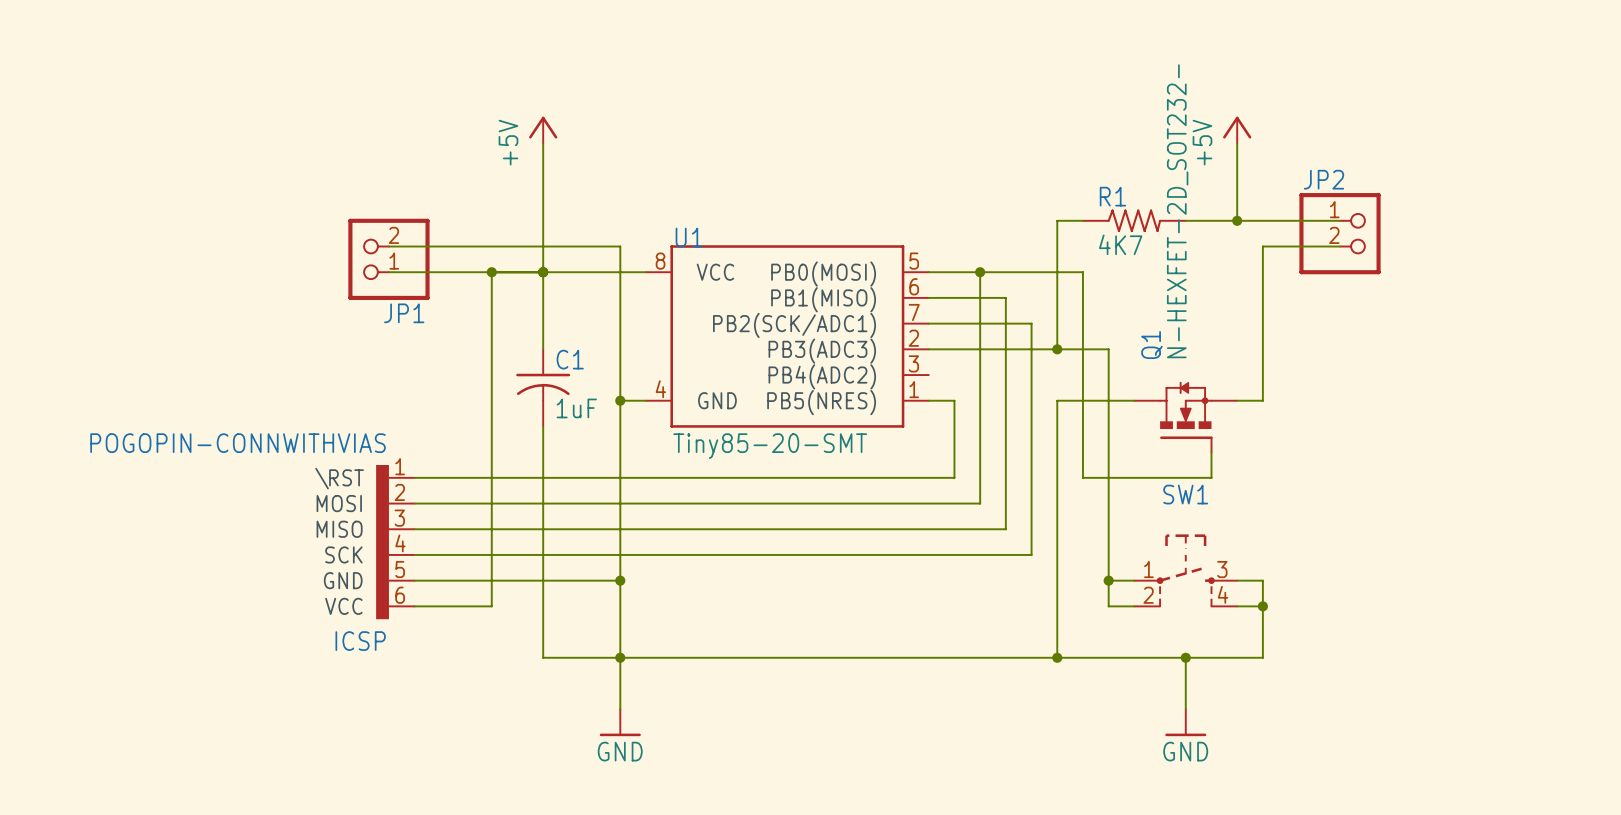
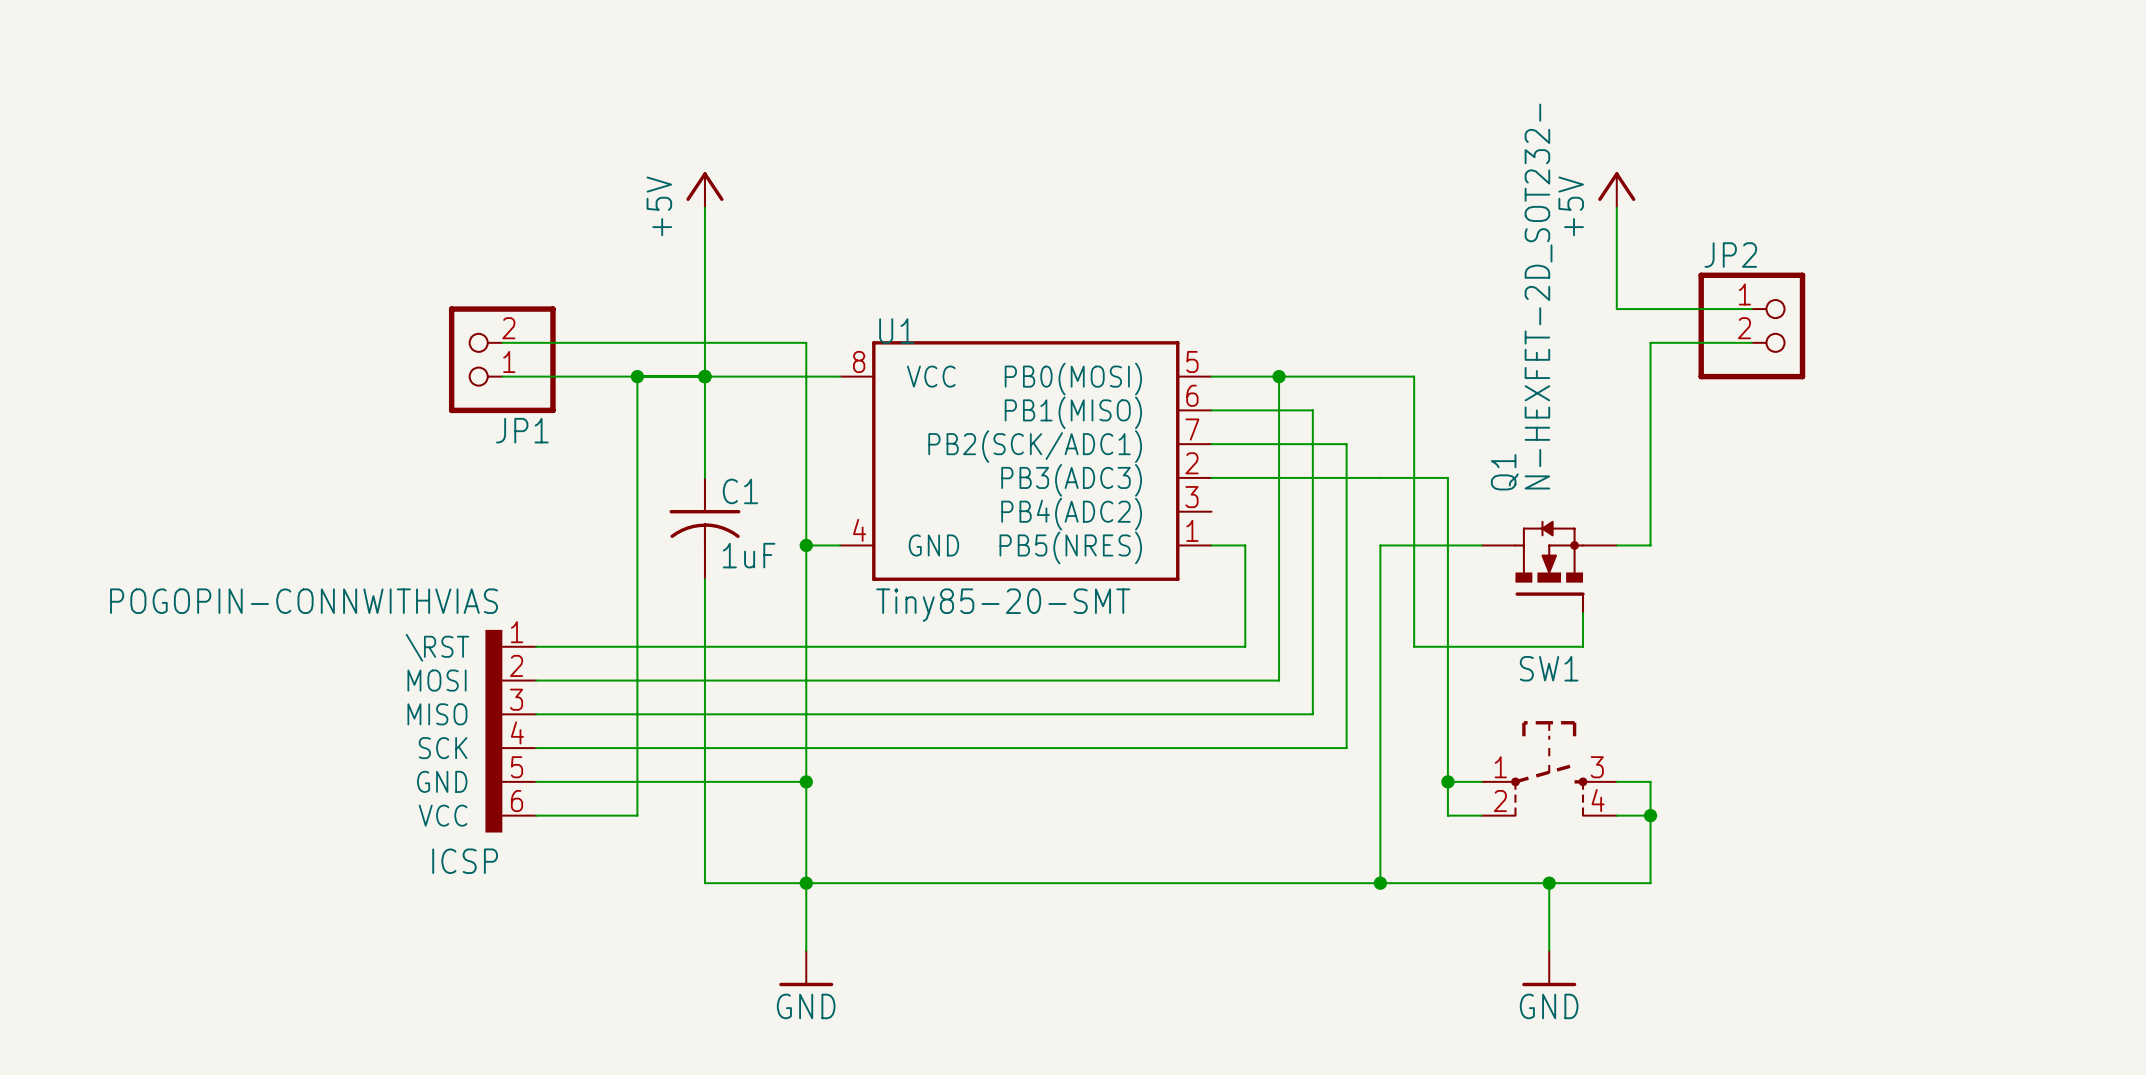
wire: (1082, 220) (1057, 220) (1057, 349) -> none
R1: 4K7 (1134, 220) -> none
wire: (1185, 220) (1237, 220) -> none
junction: (1237, 220) -> none
junction: (1057, 349) -> none

